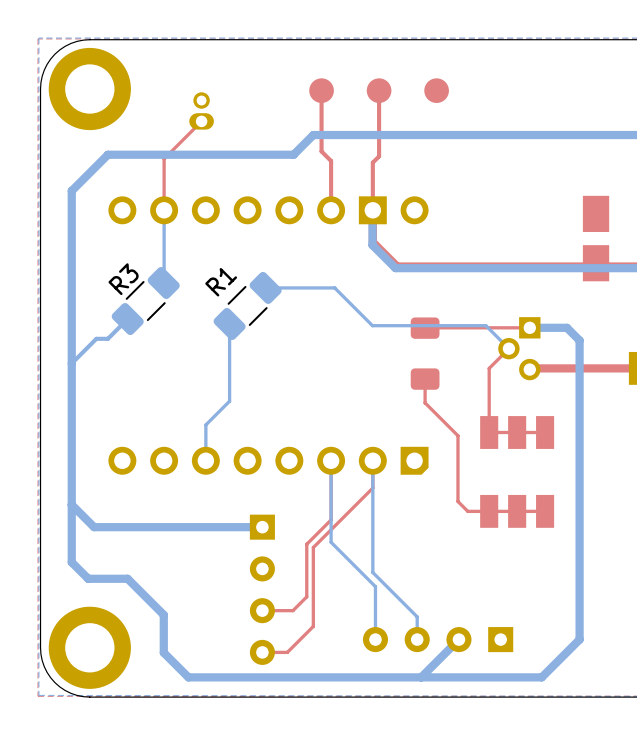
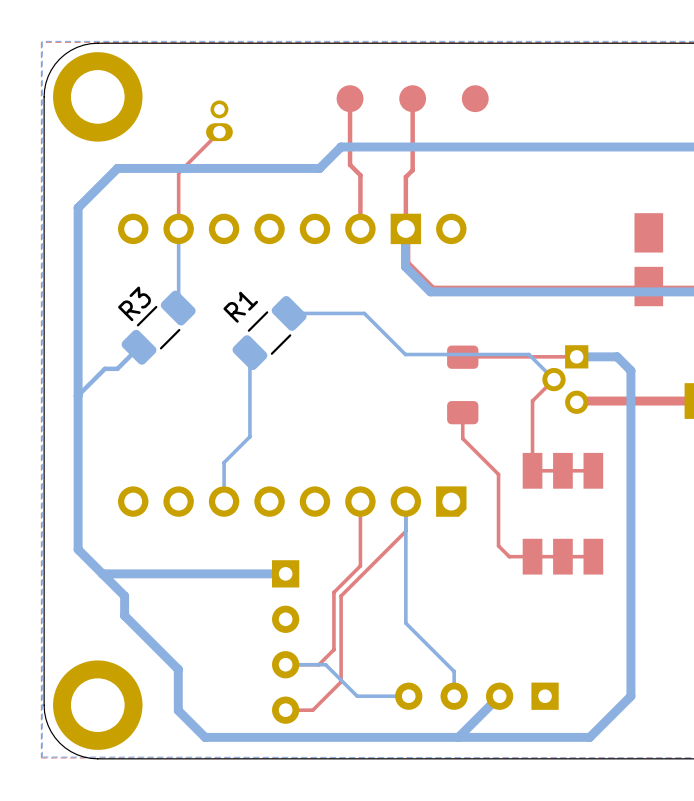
bottom track: (331, 460) (331, 542) (375, 586) (375, 639) -> (285, 664) (325, 664) (357, 696) (408, 696)
bottom track: (71, 504) (71, 562) (88, 578) (127, 578) -> (102, 573) (124, 596) (124, 615) (138, 630)

